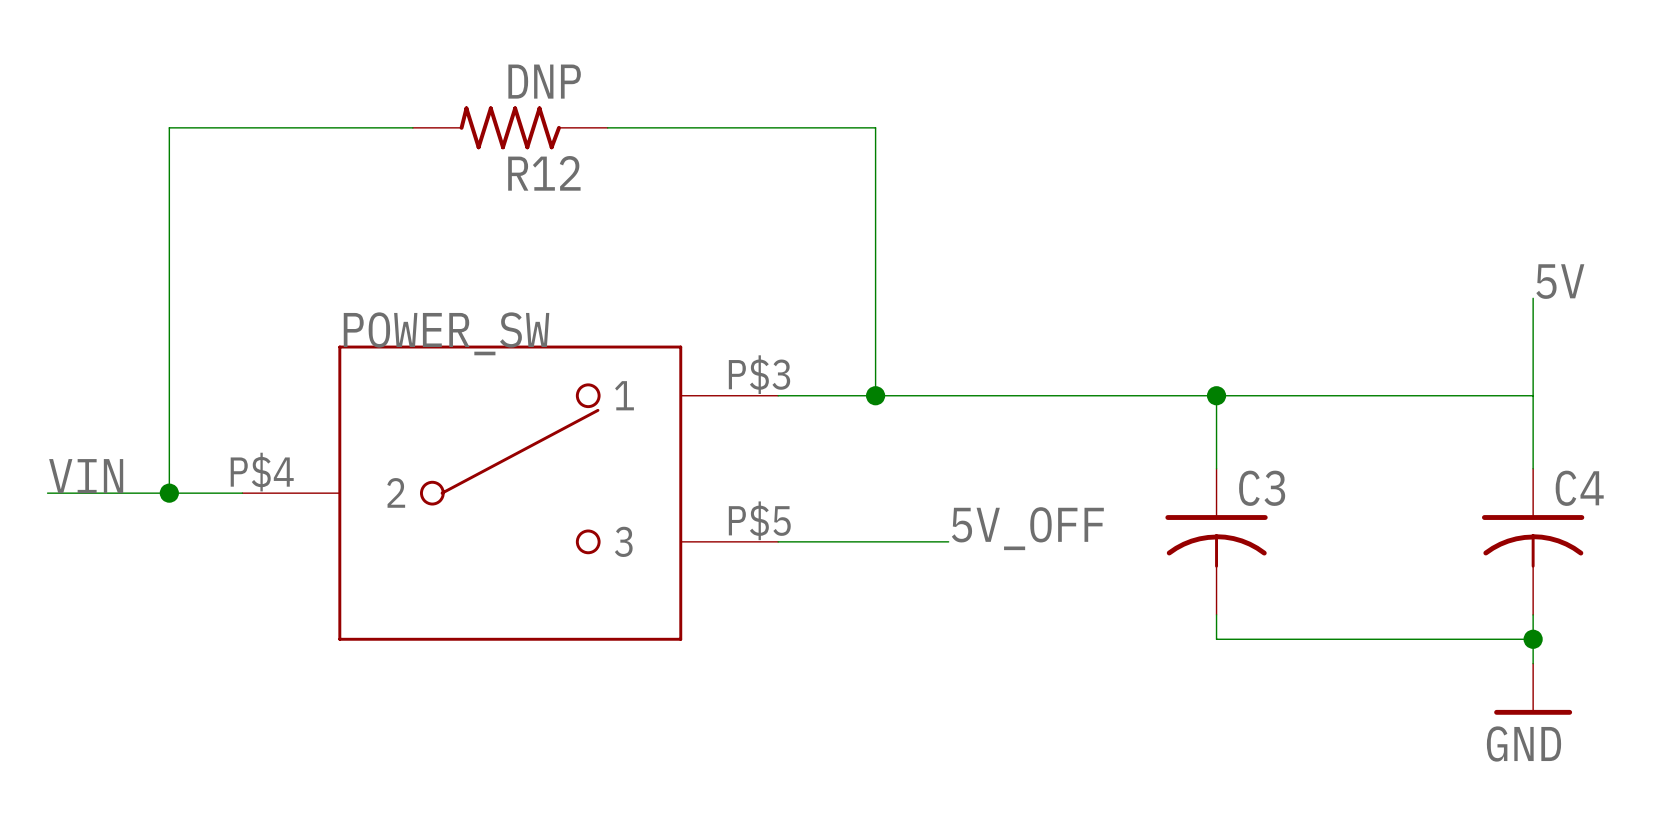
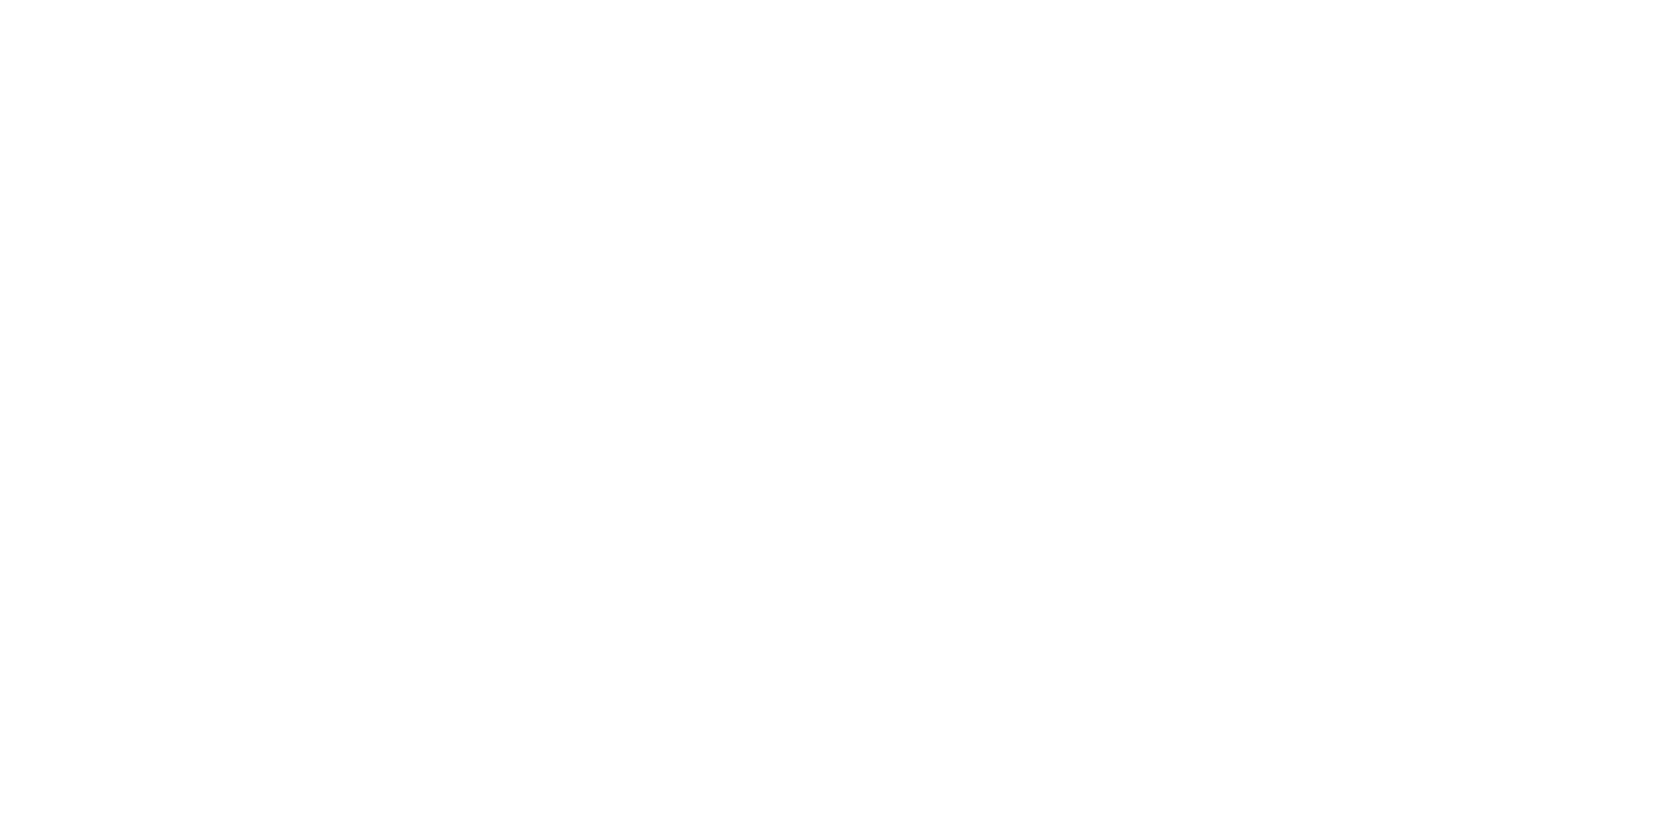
wire: (412, 127) (169, 127) (169, 493) -> none
R12: DNP (510, 127) -> none
wire: (607, 127) (875, 127) (875, 395) -> none
label: 5V (1560, 281) -> none
wire: (1533, 298) (1533, 468) -> none
wire: (778, 395) (1533, 395) -> none
junction: (875, 395) -> none
wire: (1216, 395) (1216, 468) -> none
junction: (1216, 395) -> none
label: VIN (86, 476) -> none
wire: (47, 493) (242, 493) -> none
junction: (169, 493) -> none
POWER_SW: (510, 493) -> none
label: 5V_OFF (1027, 528) -> none
wire: (778, 541) (948, 541) -> none
C3: (1216, 541) -> none
C4: (1533, 541) -> none
wire: (1216, 614) (1216, 639) (1533, 639) -> none
wire: (1533, 614) (1533, 663) -> none
junction: (1533, 639) -> none
power symbol: GND (1533, 689) -> none

